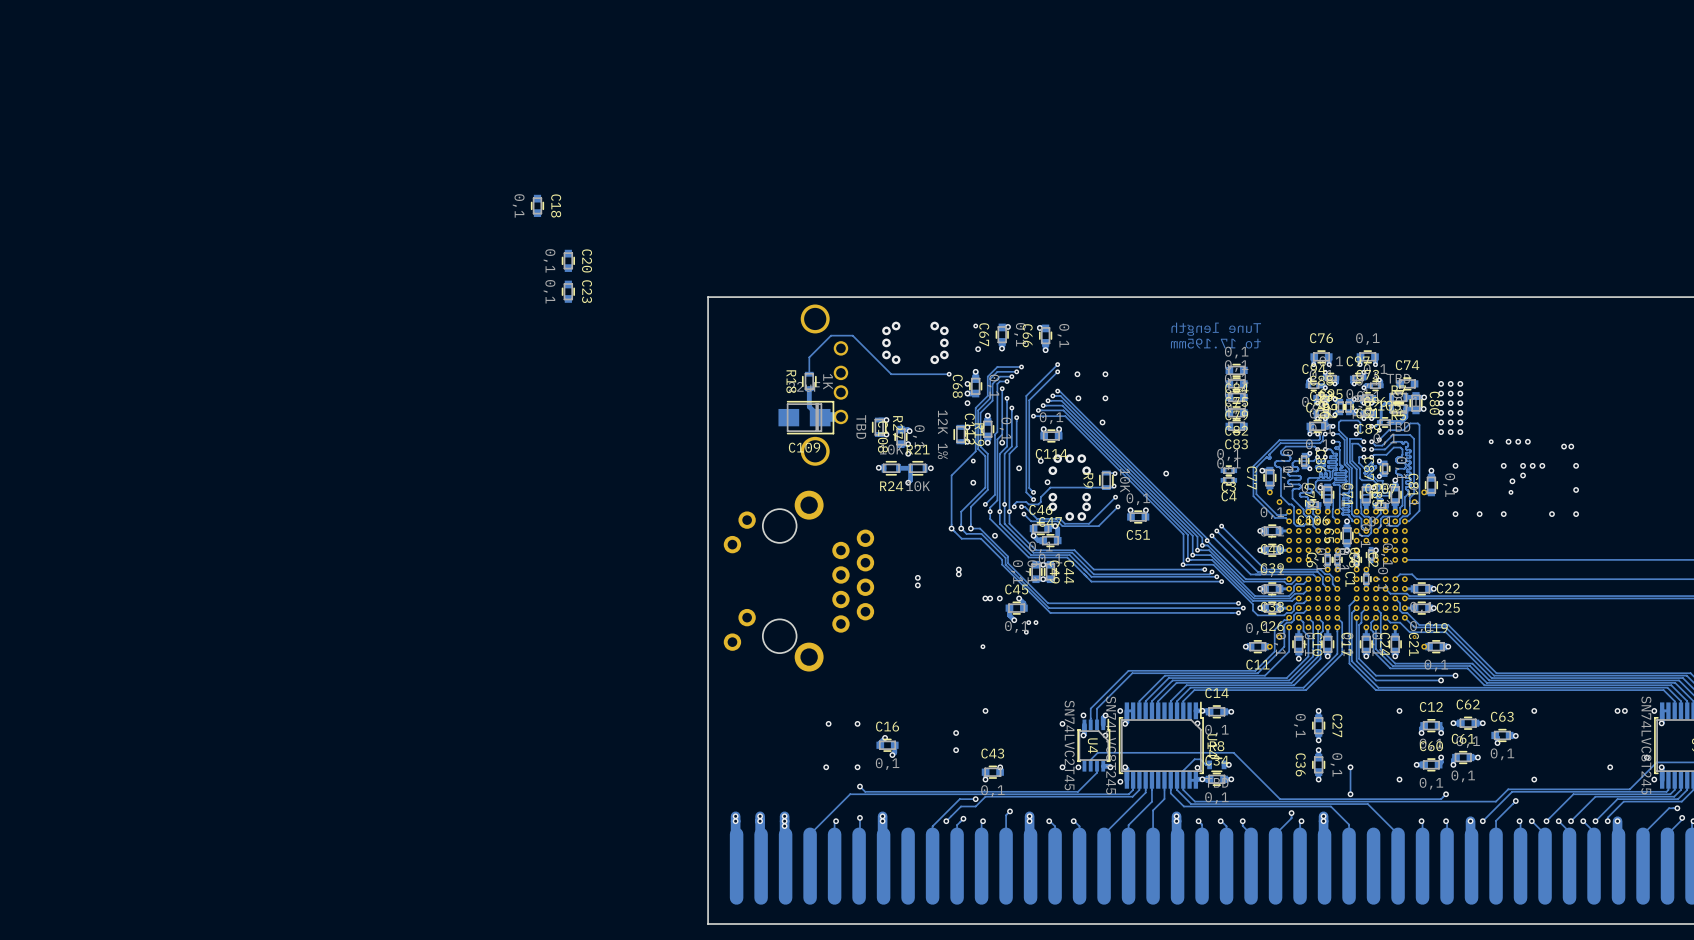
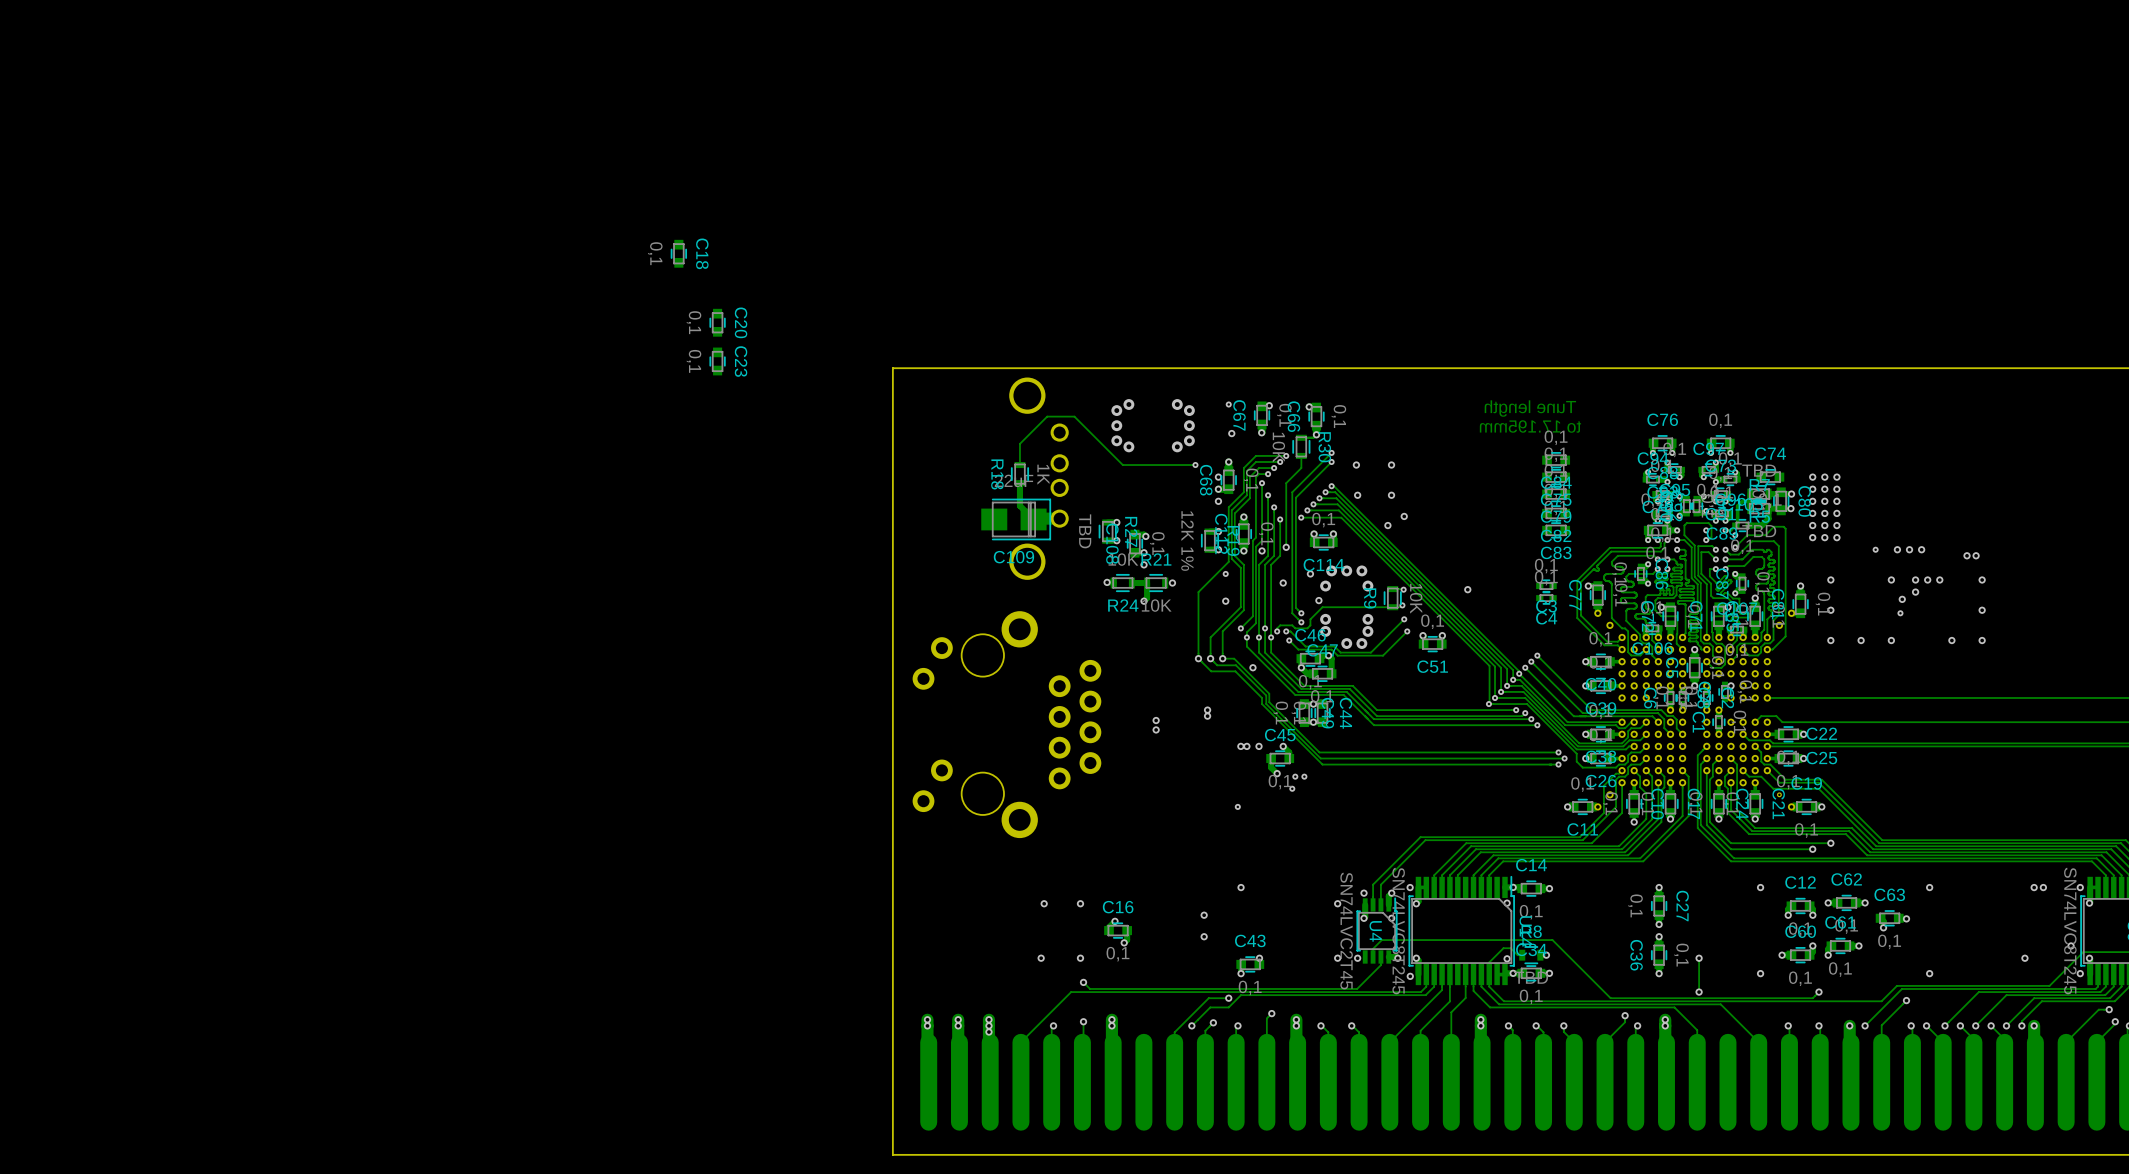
track: none -> (1316, 434) (1313, 437) (1301, 437)
R30: none -> 10K (1301, 446)
track: none -> (1301, 455) (1301, 468) (1286, 483) (1286, 547)
via: none -> (1404, 516)
via: none -> (1286, 547)

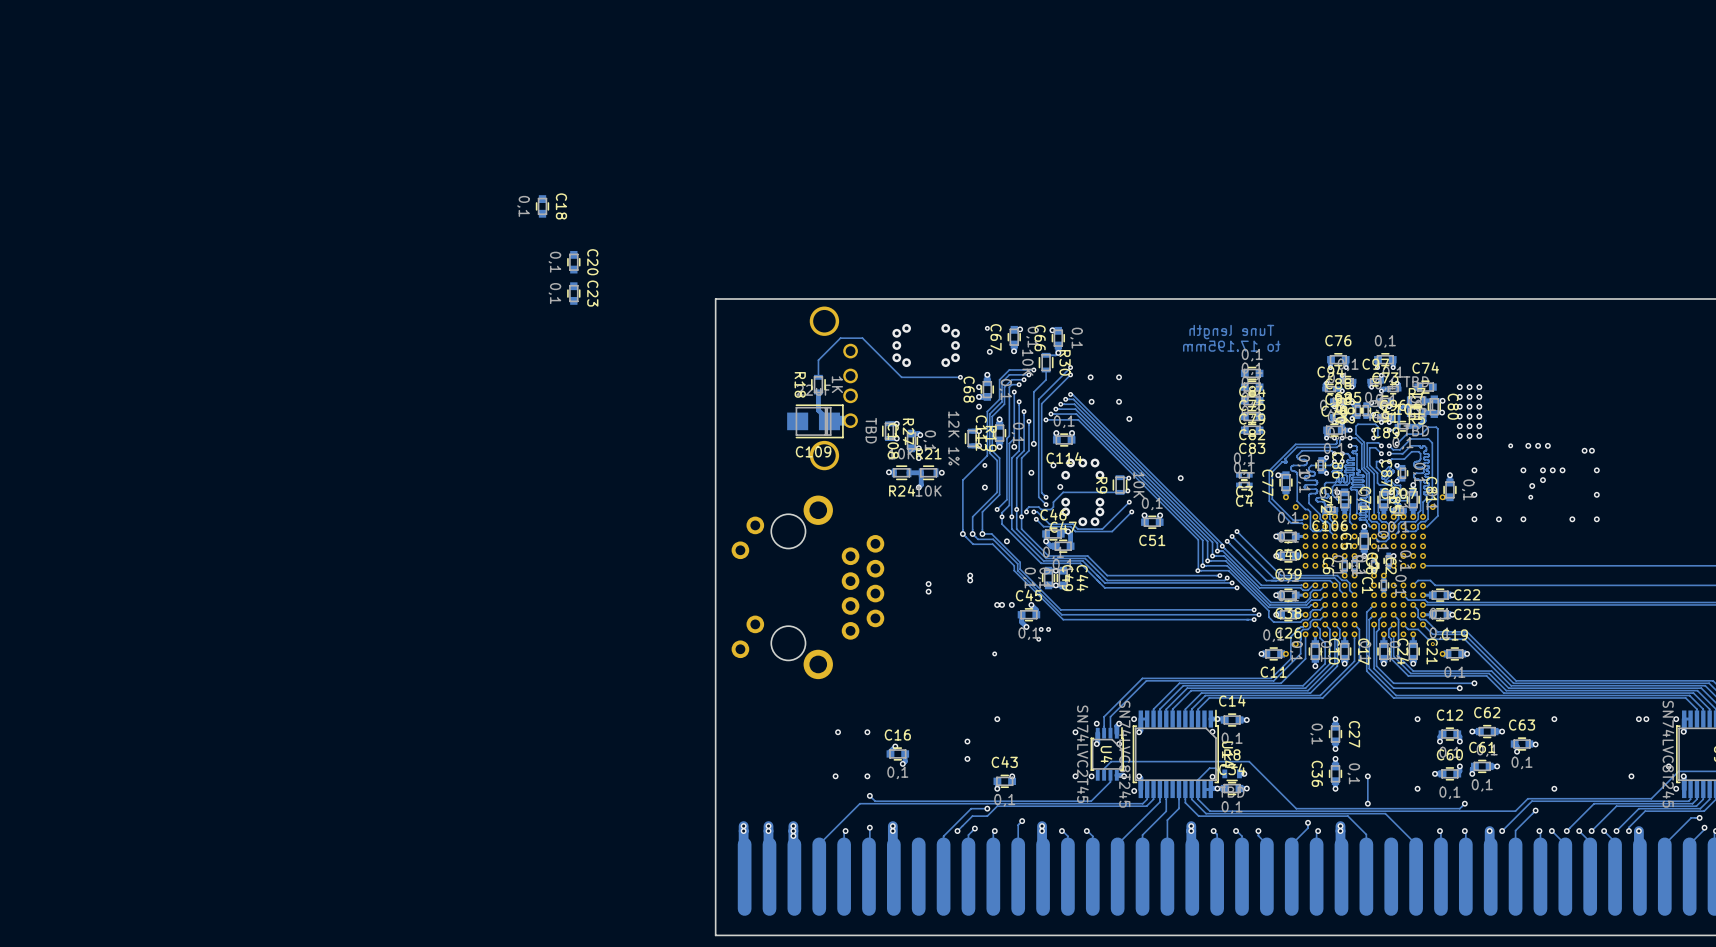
via: (1387, 525) -> none

